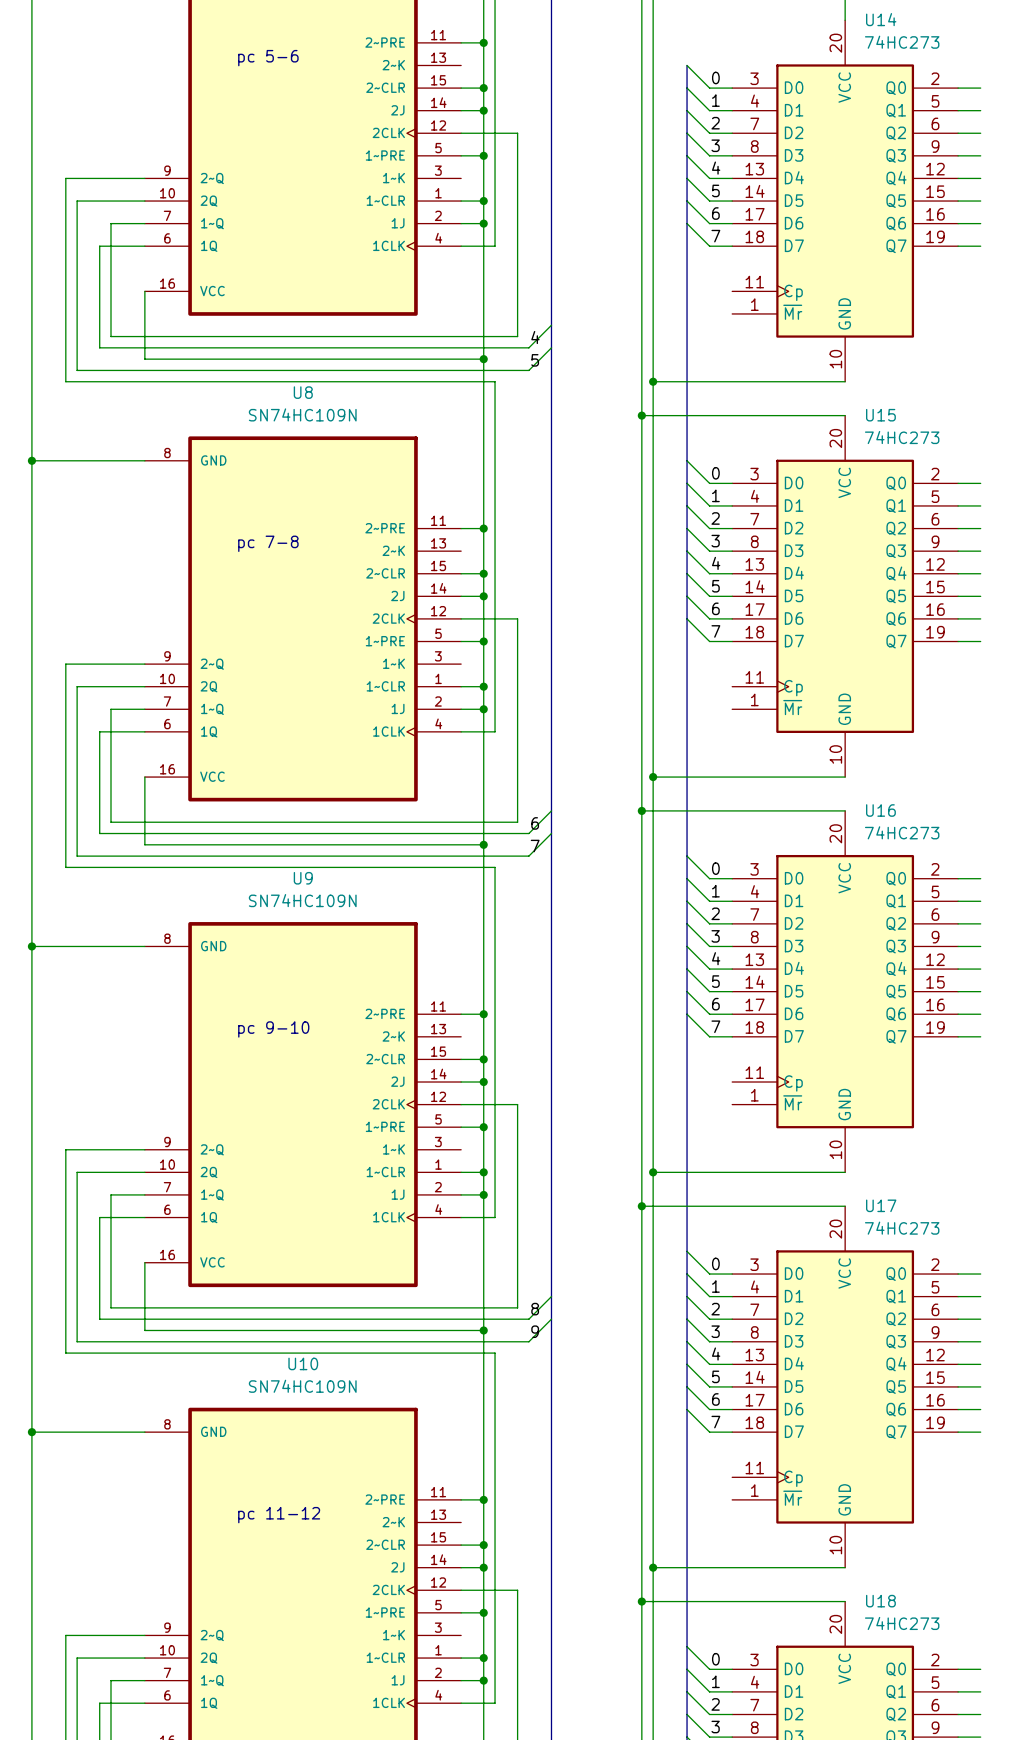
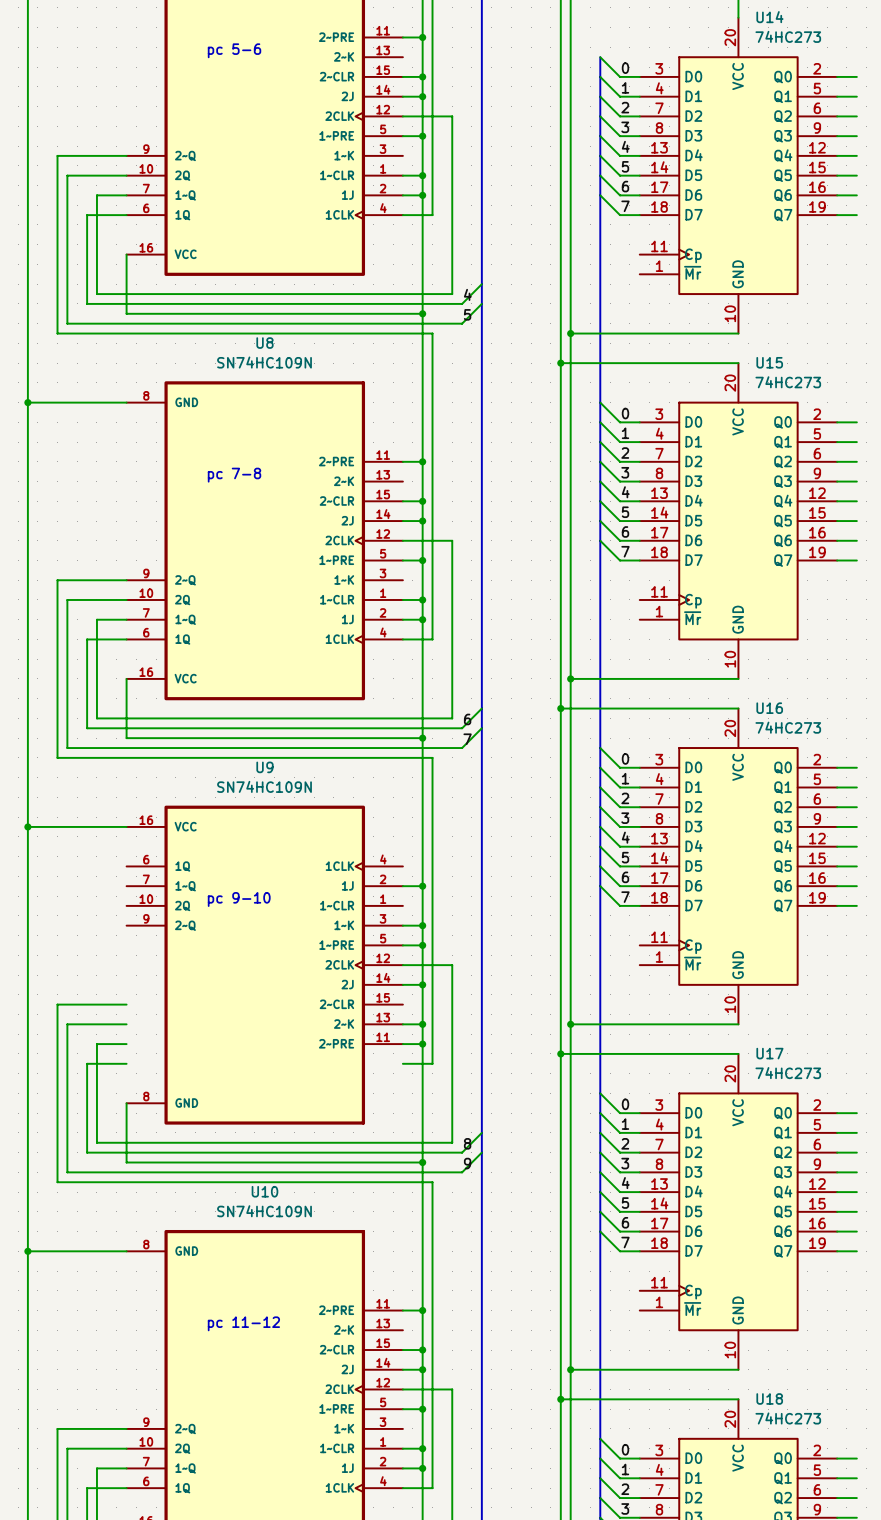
U9 flip: as is (303, 1104) -> up-down (264, 965)

